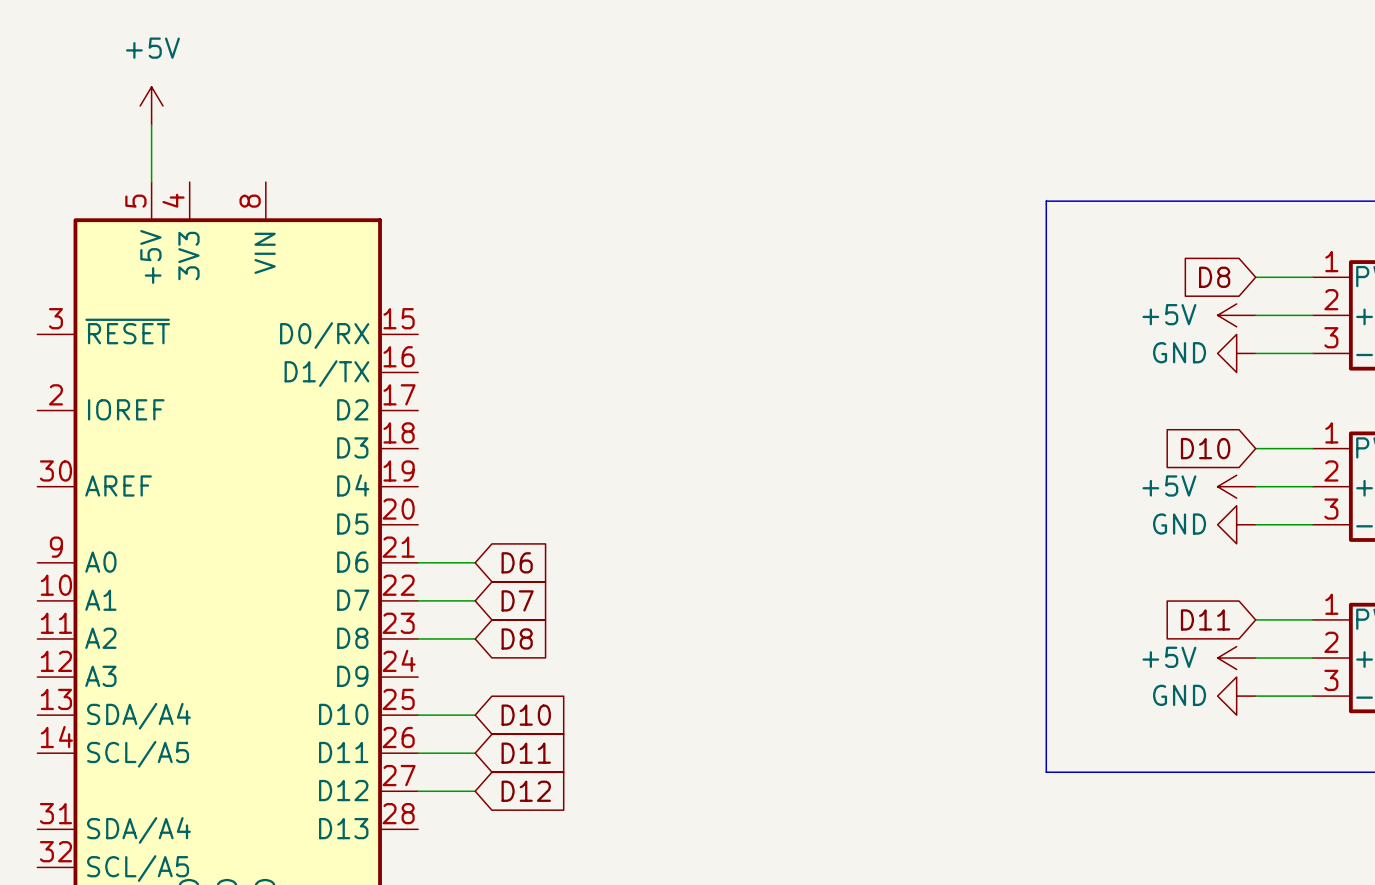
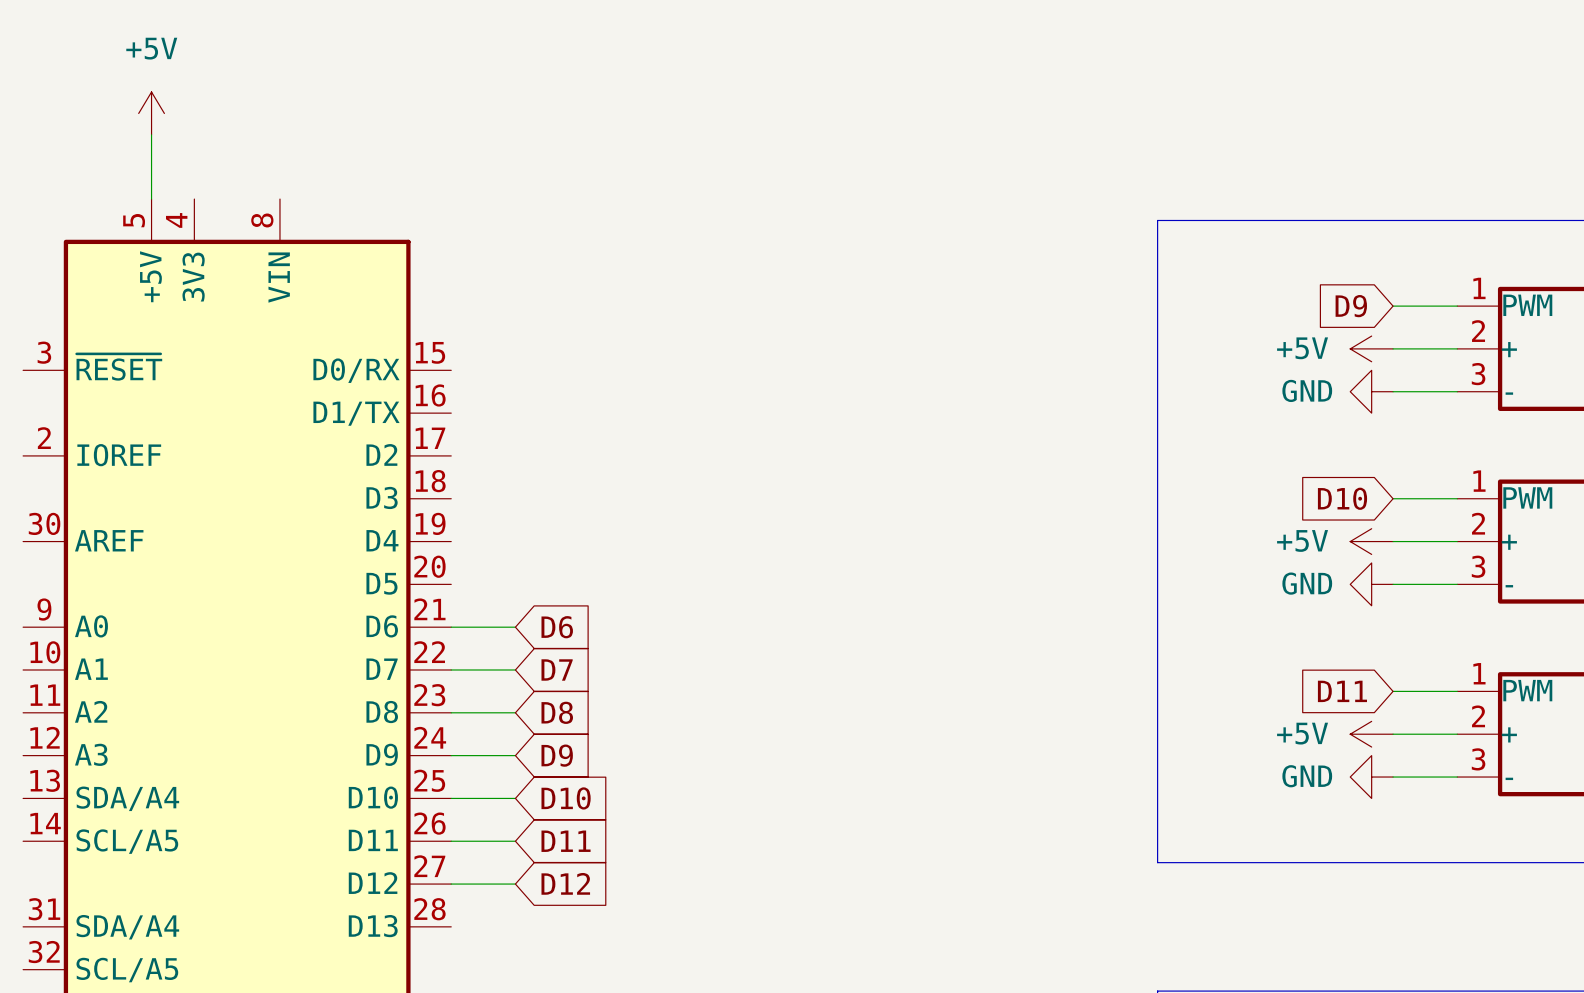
global label: D8 (1214, 277) -> D9 (1351, 306)
wire: none -> (451, 755) (515, 755)
global label: none -> D9 (557, 755)

